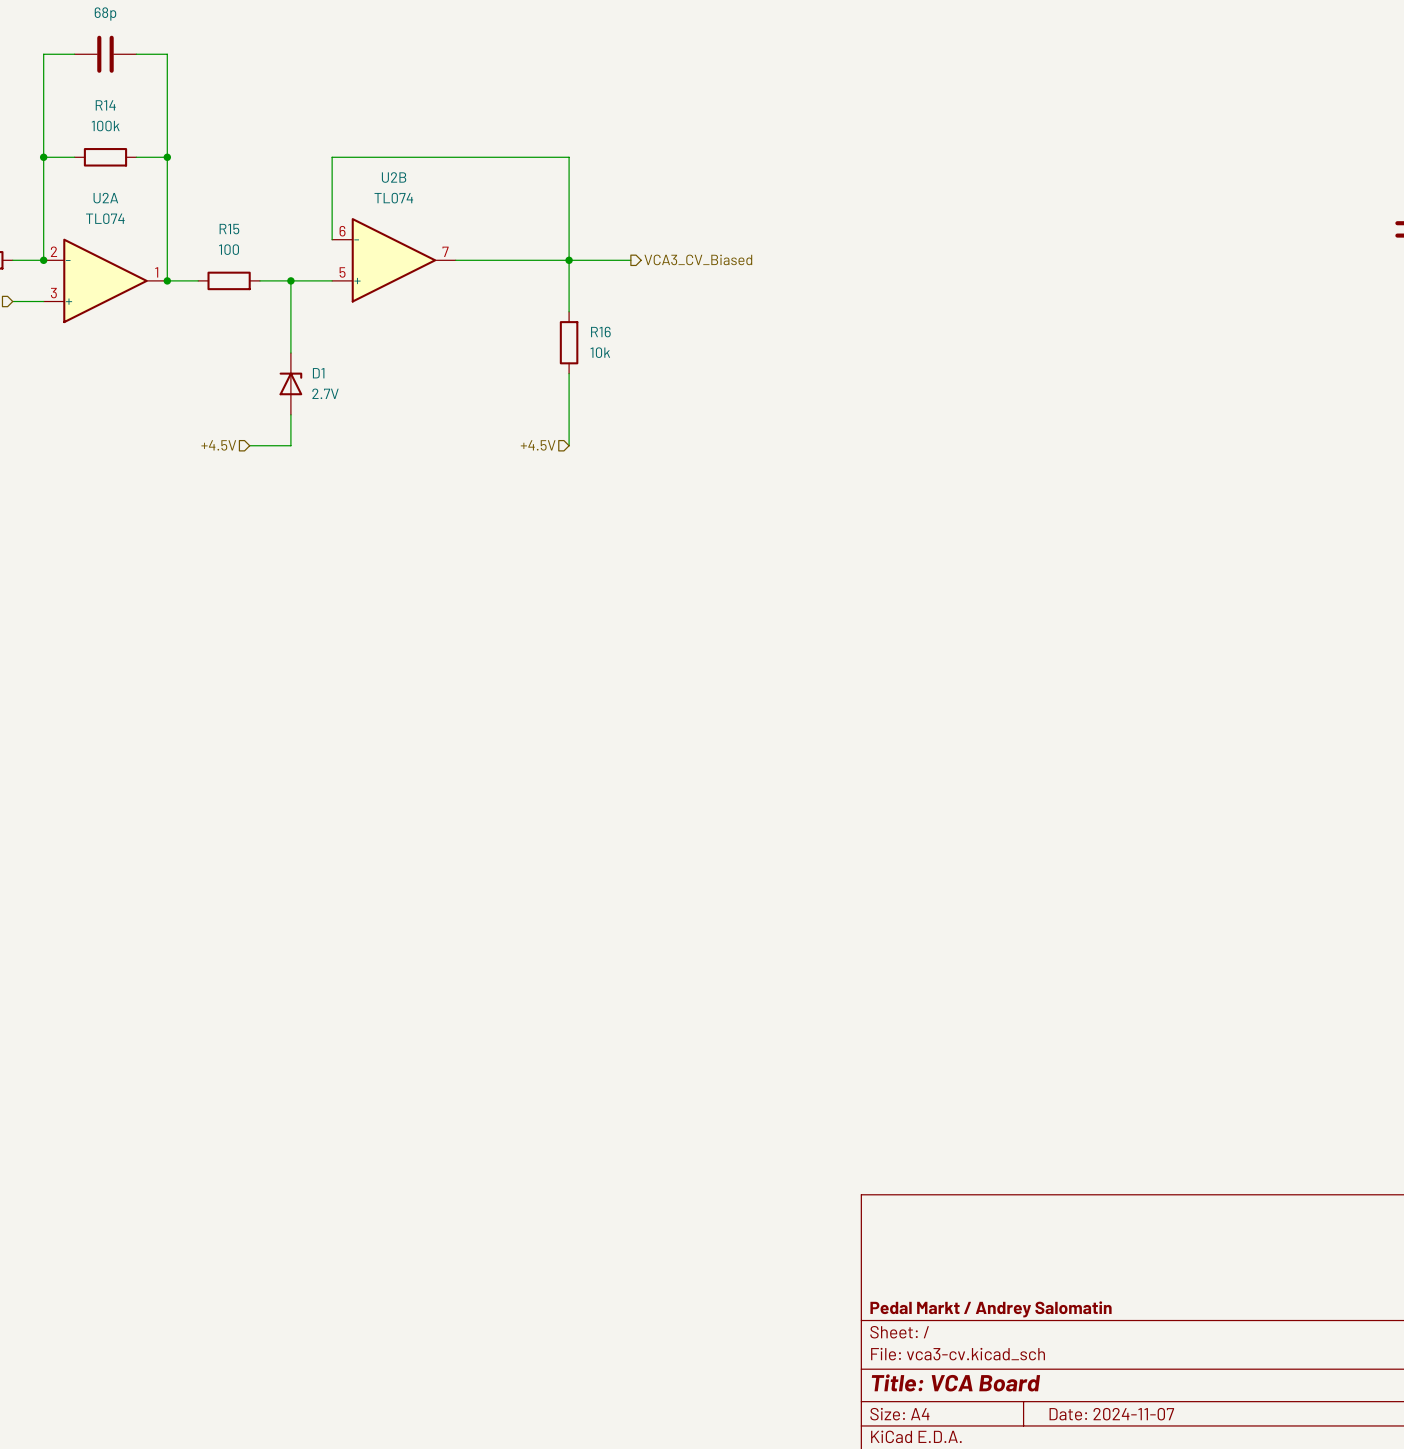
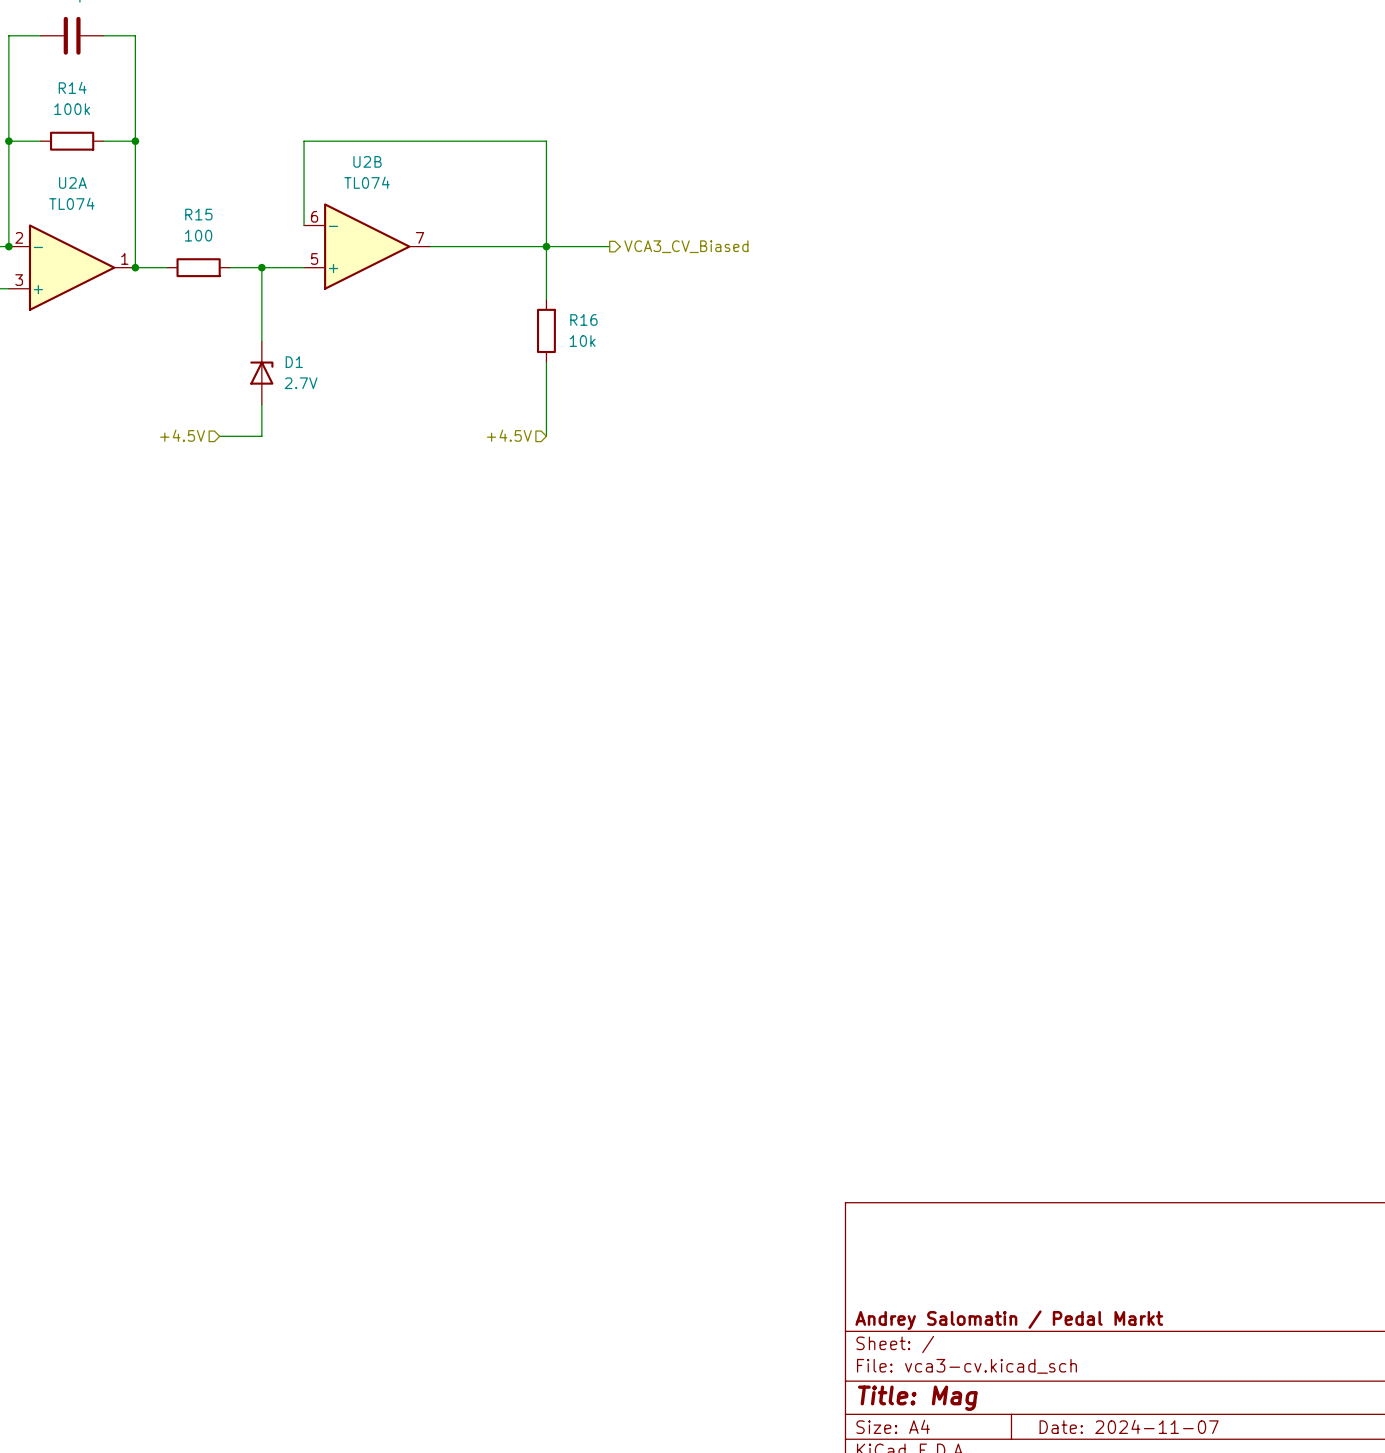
title block: Pedal Markt / Andrey Salomatin (991, 1309) -> Andrey Salomatin / Pedal Markt (1009, 1320)
title block: Title: VCA Board (955, 1382) -> Title: Mag (917, 1398)

